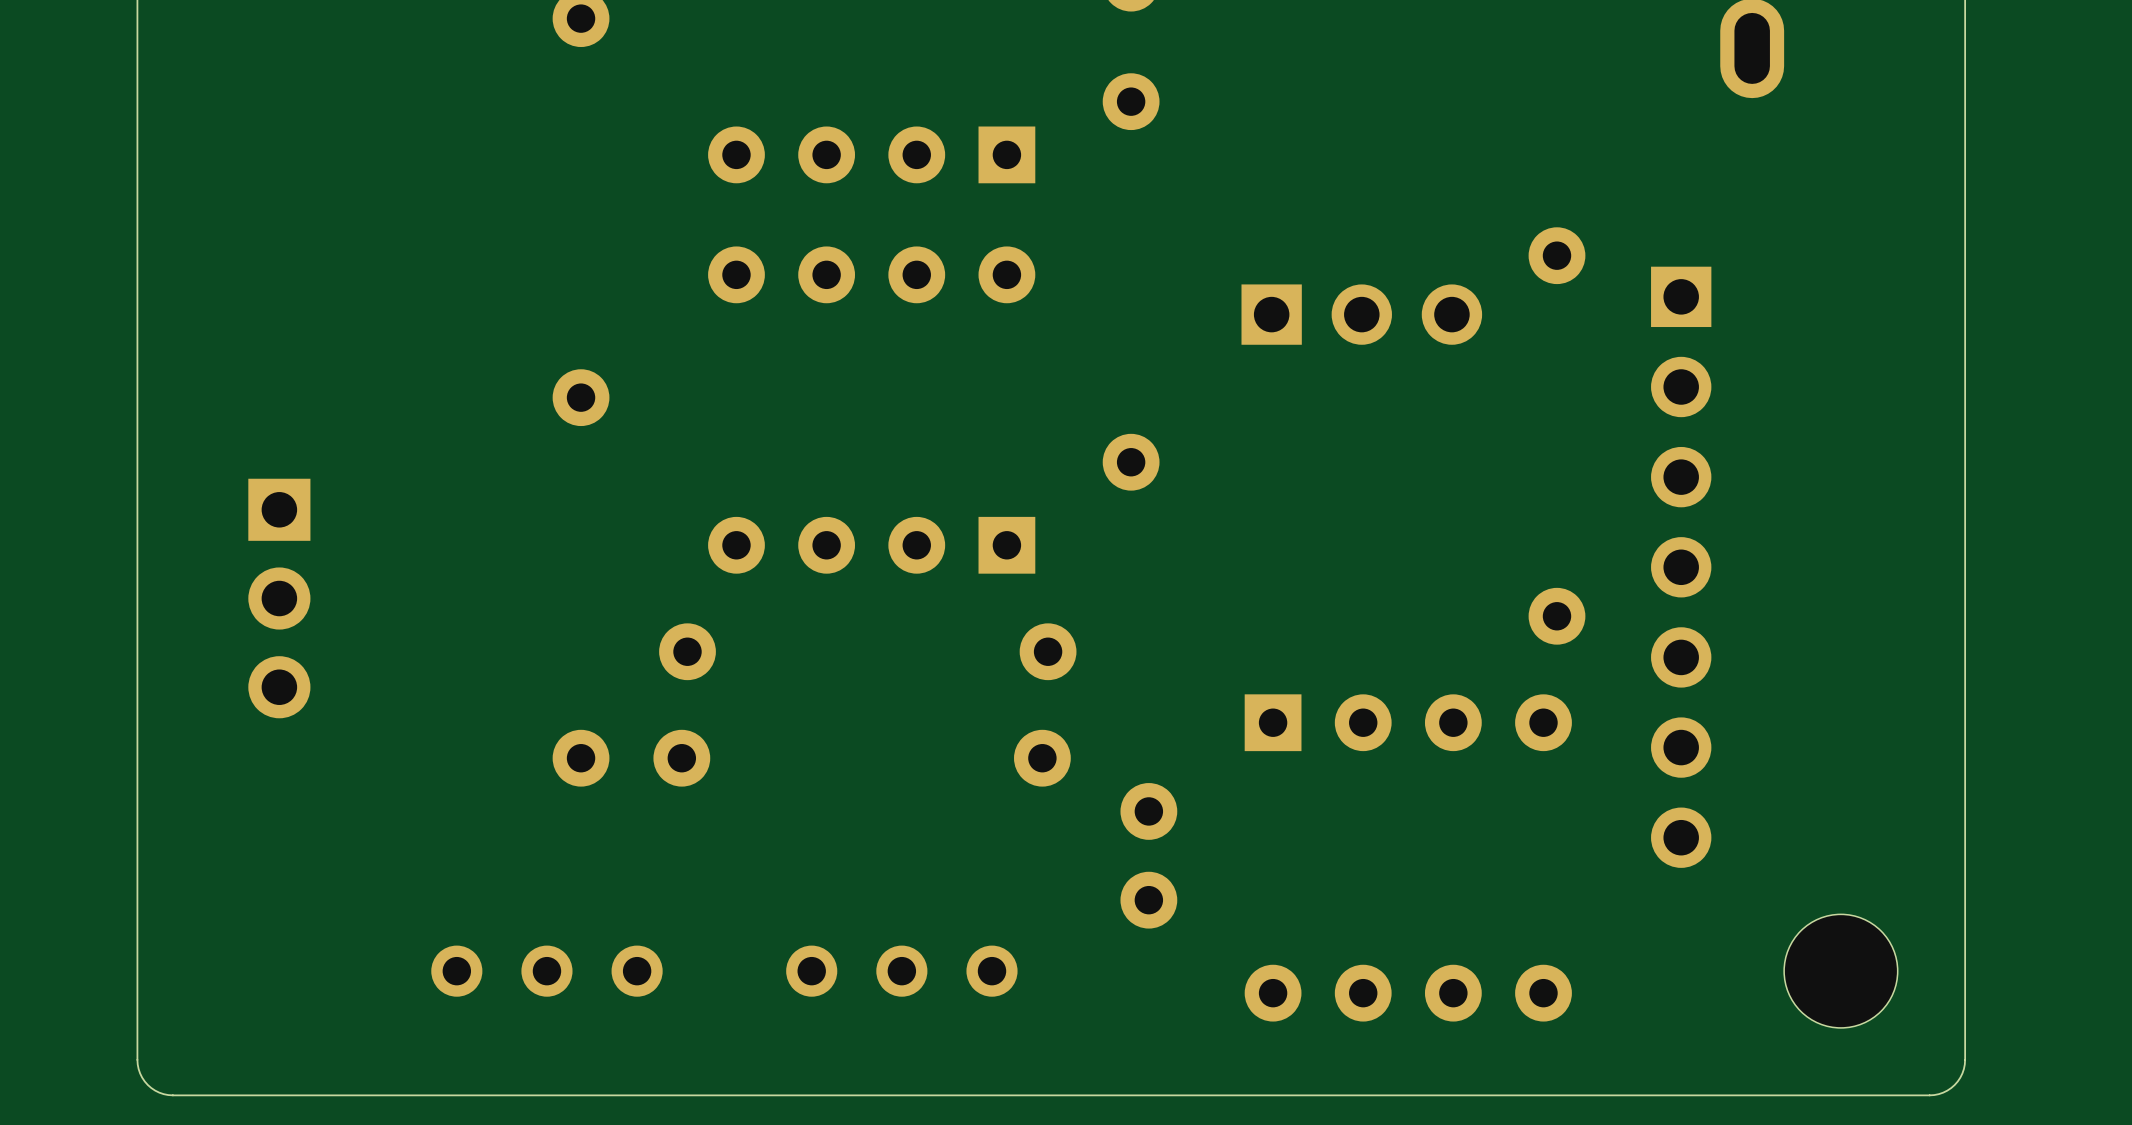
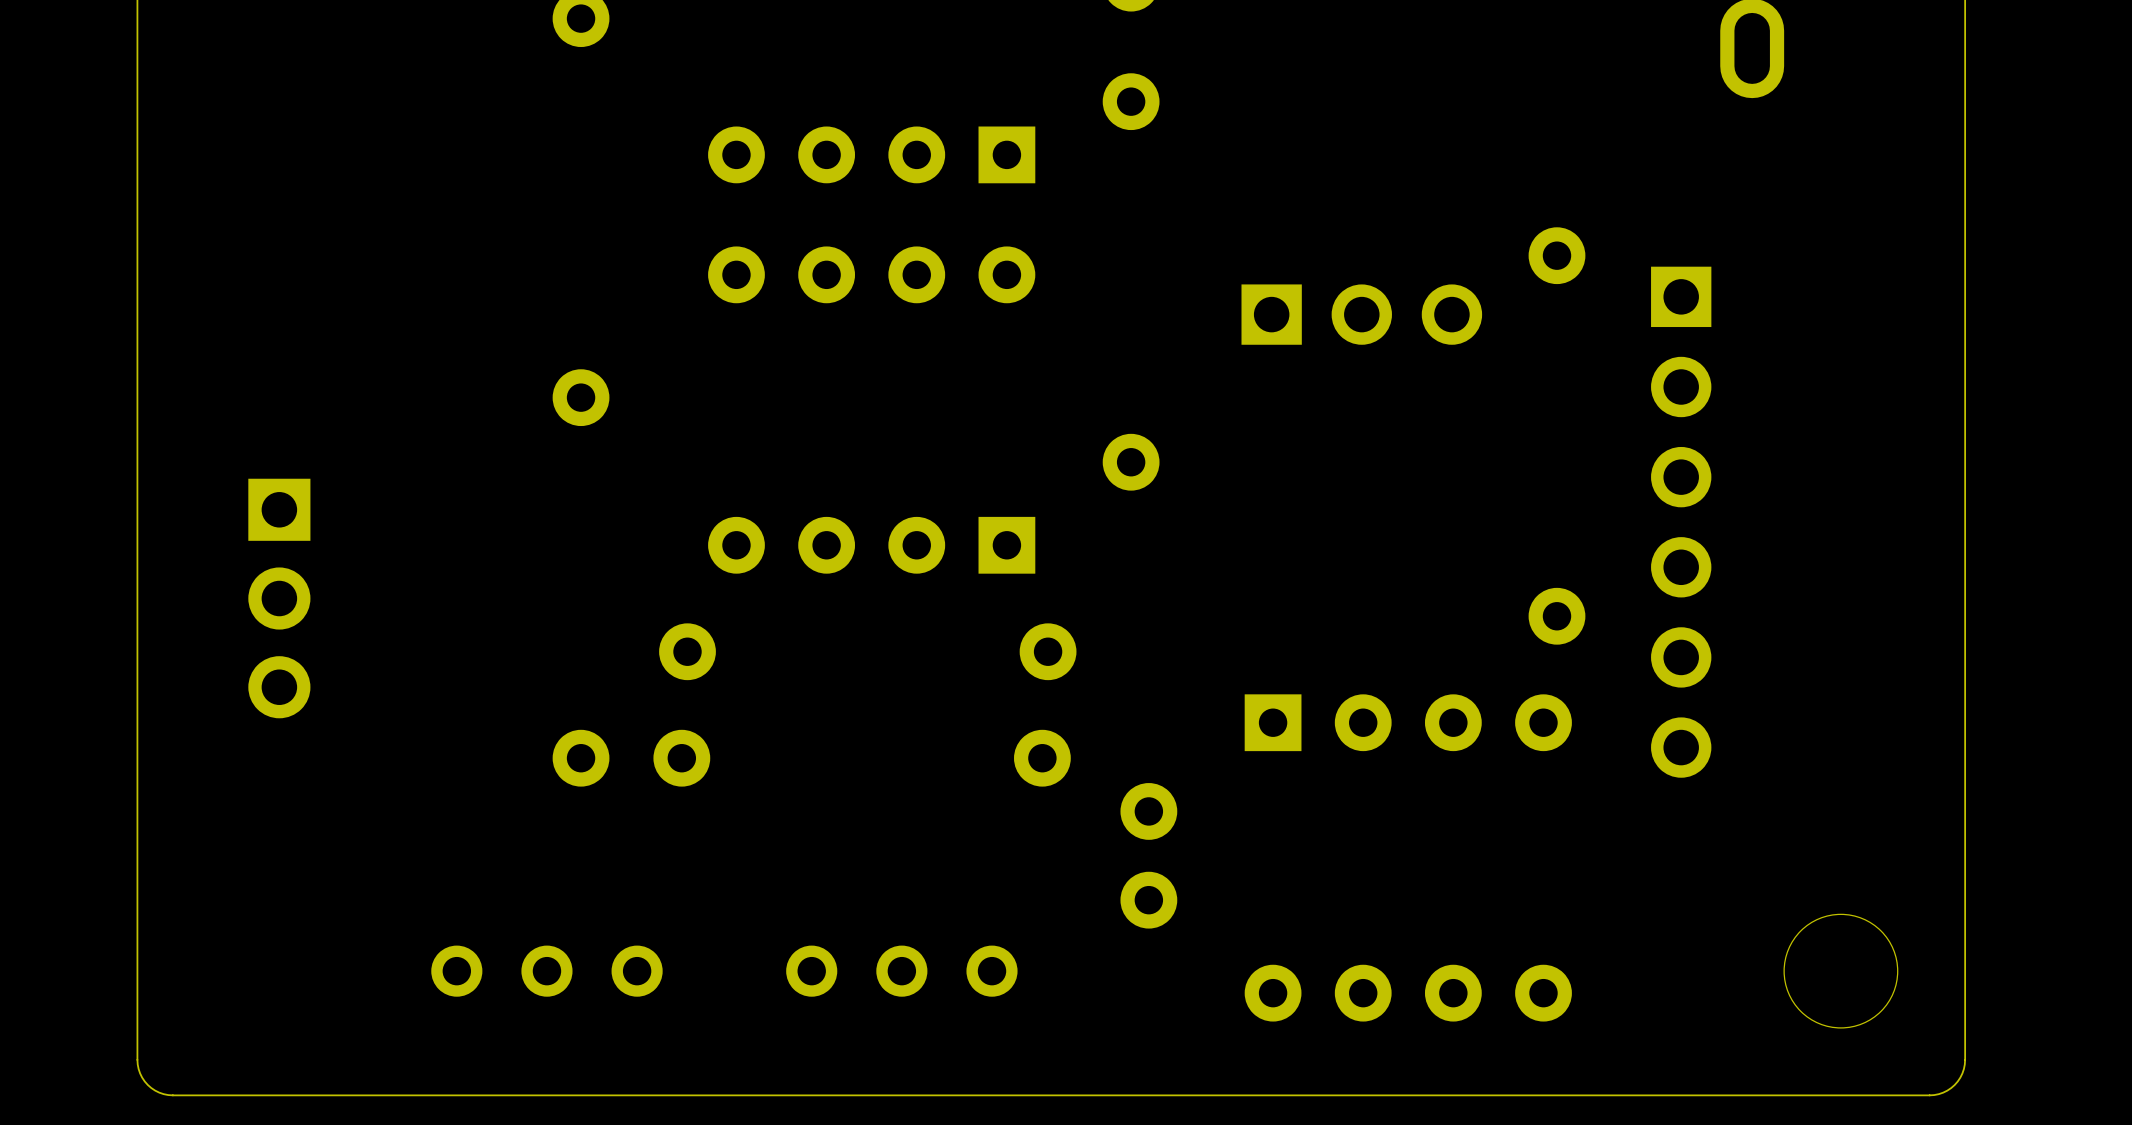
part: (1681, 567) -> none

